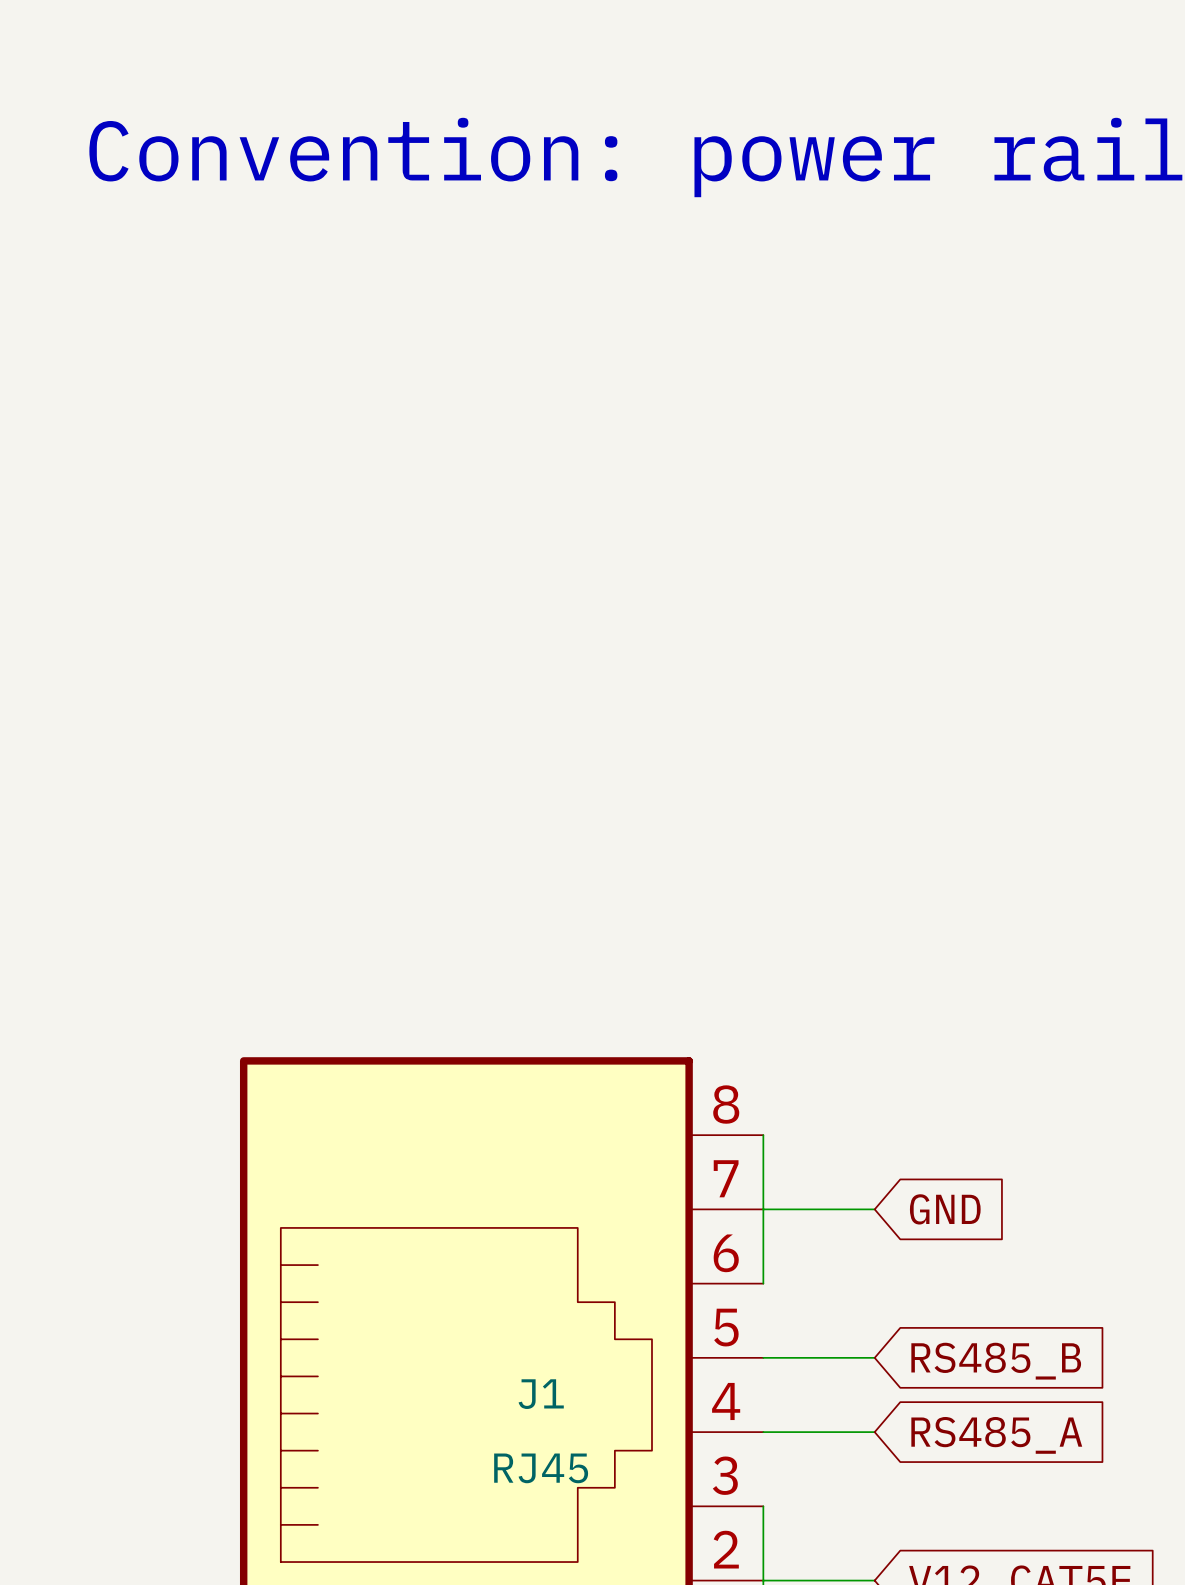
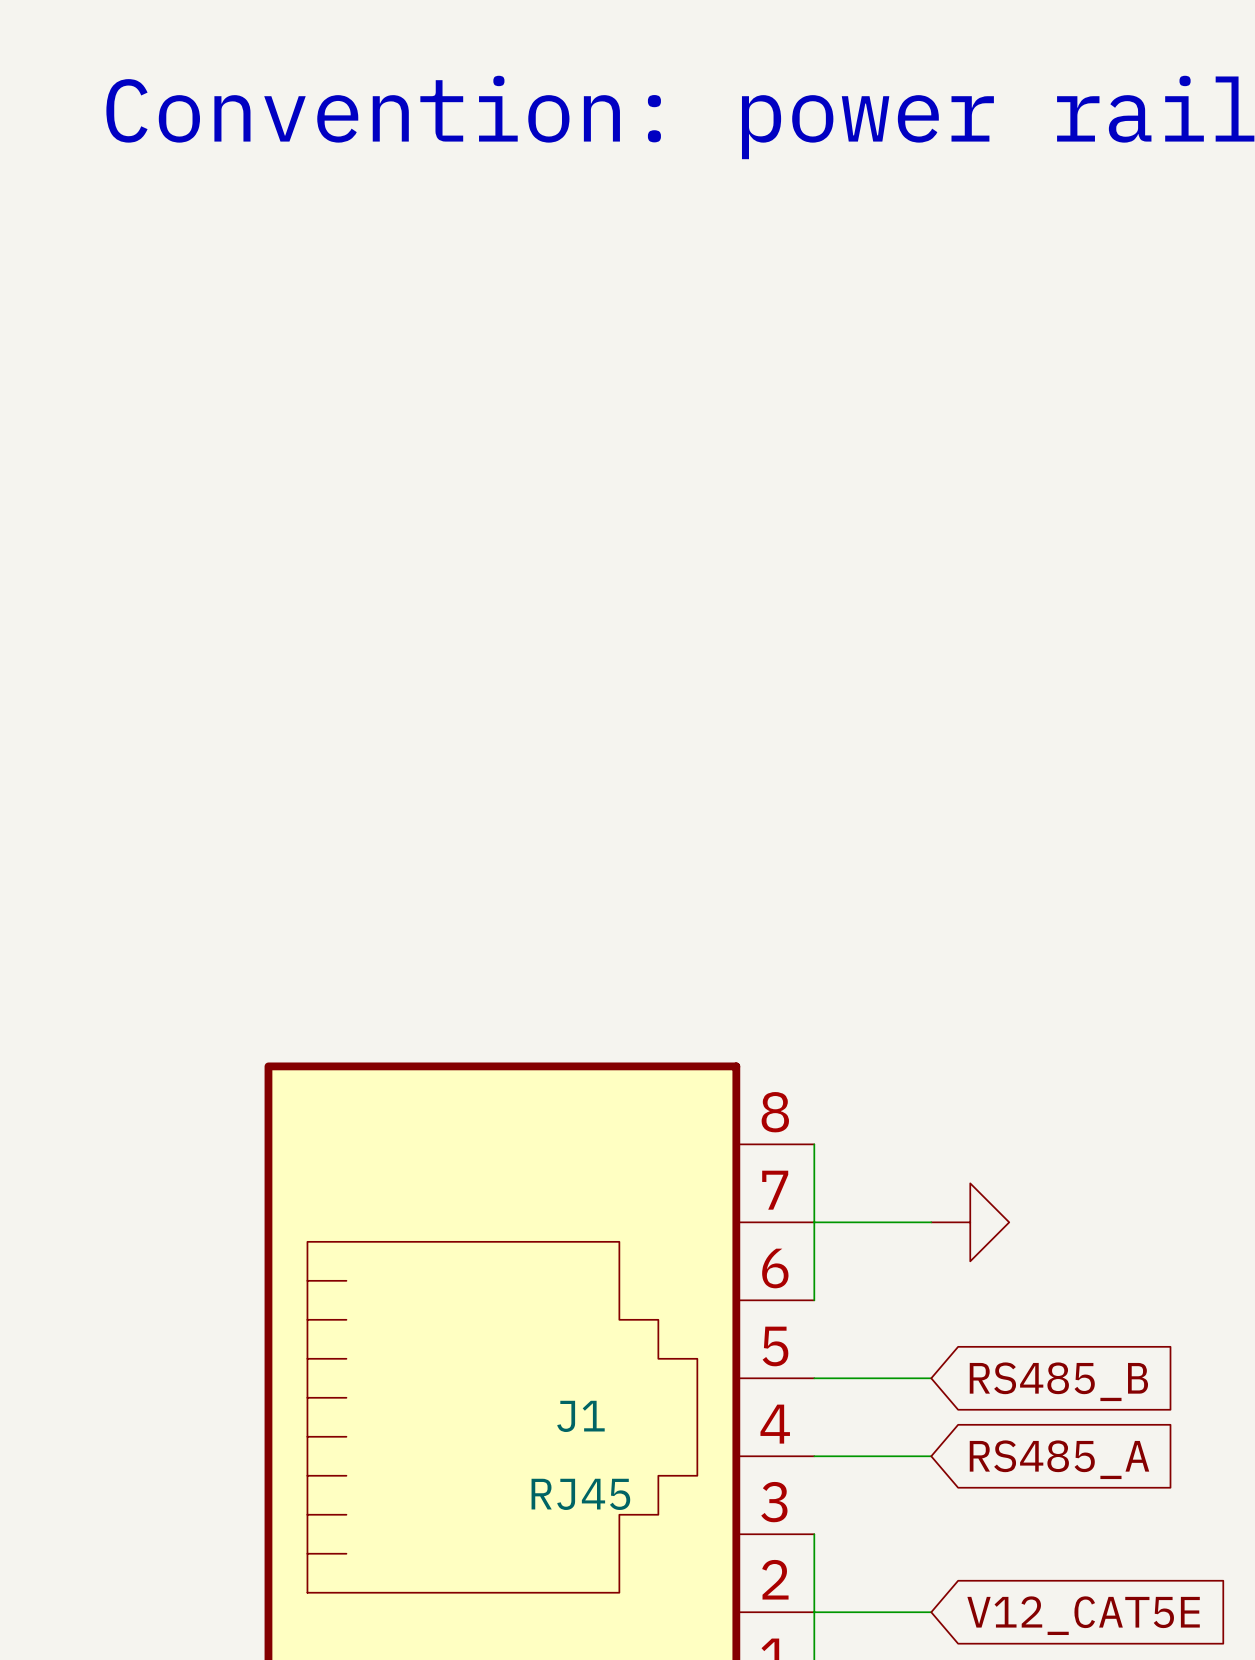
power symbol: none -> (970, 1222)
global label: GND (945, 1209) -> none

